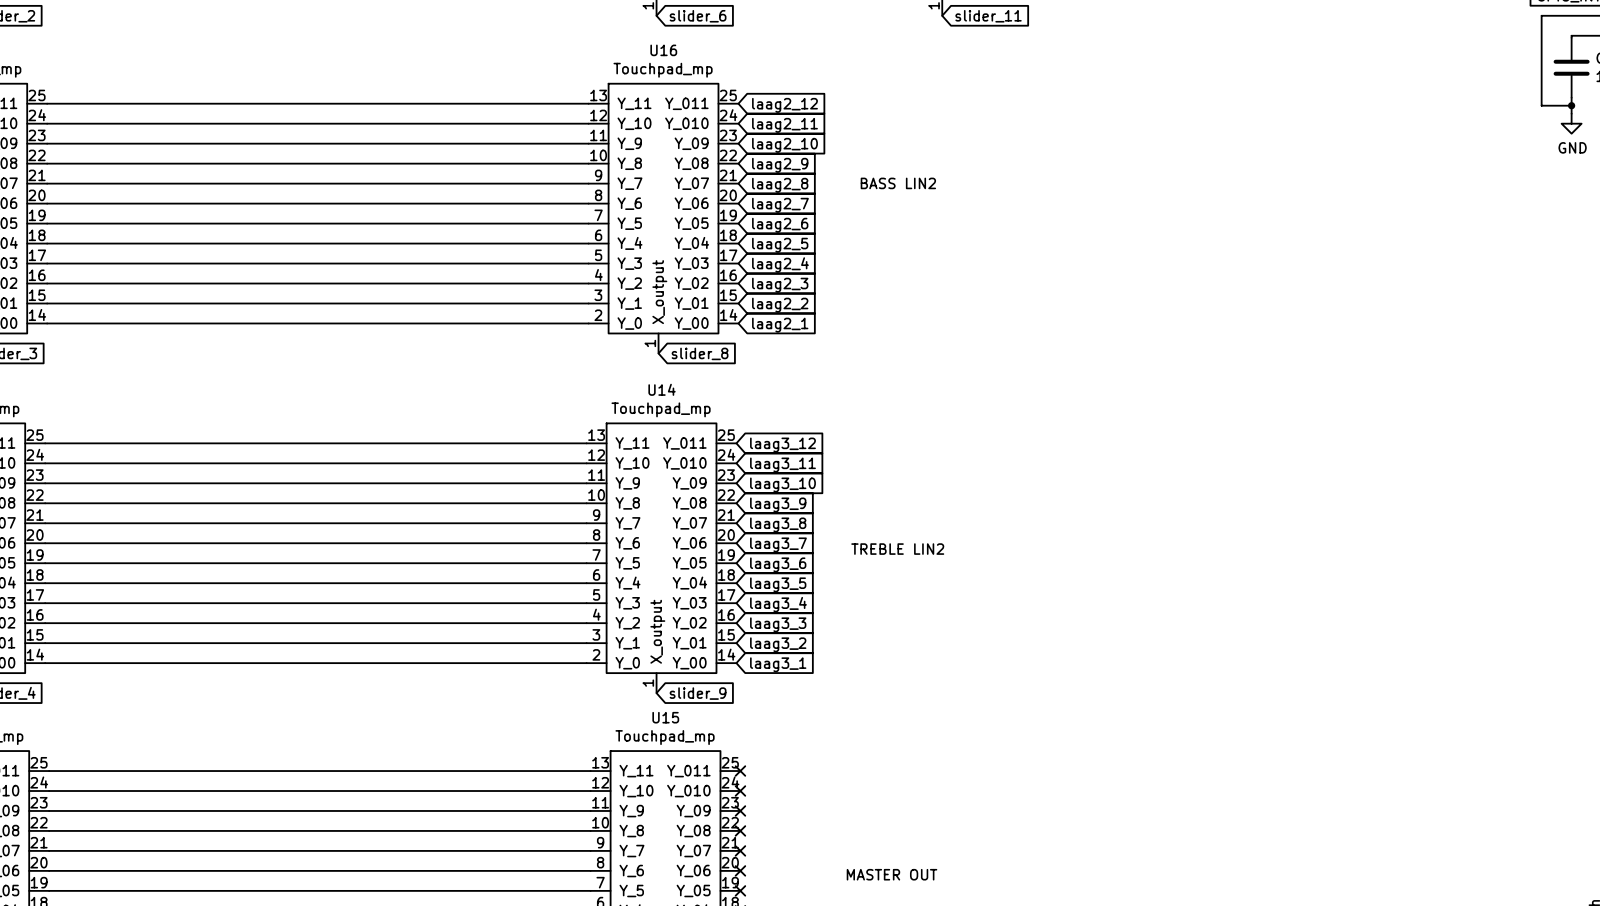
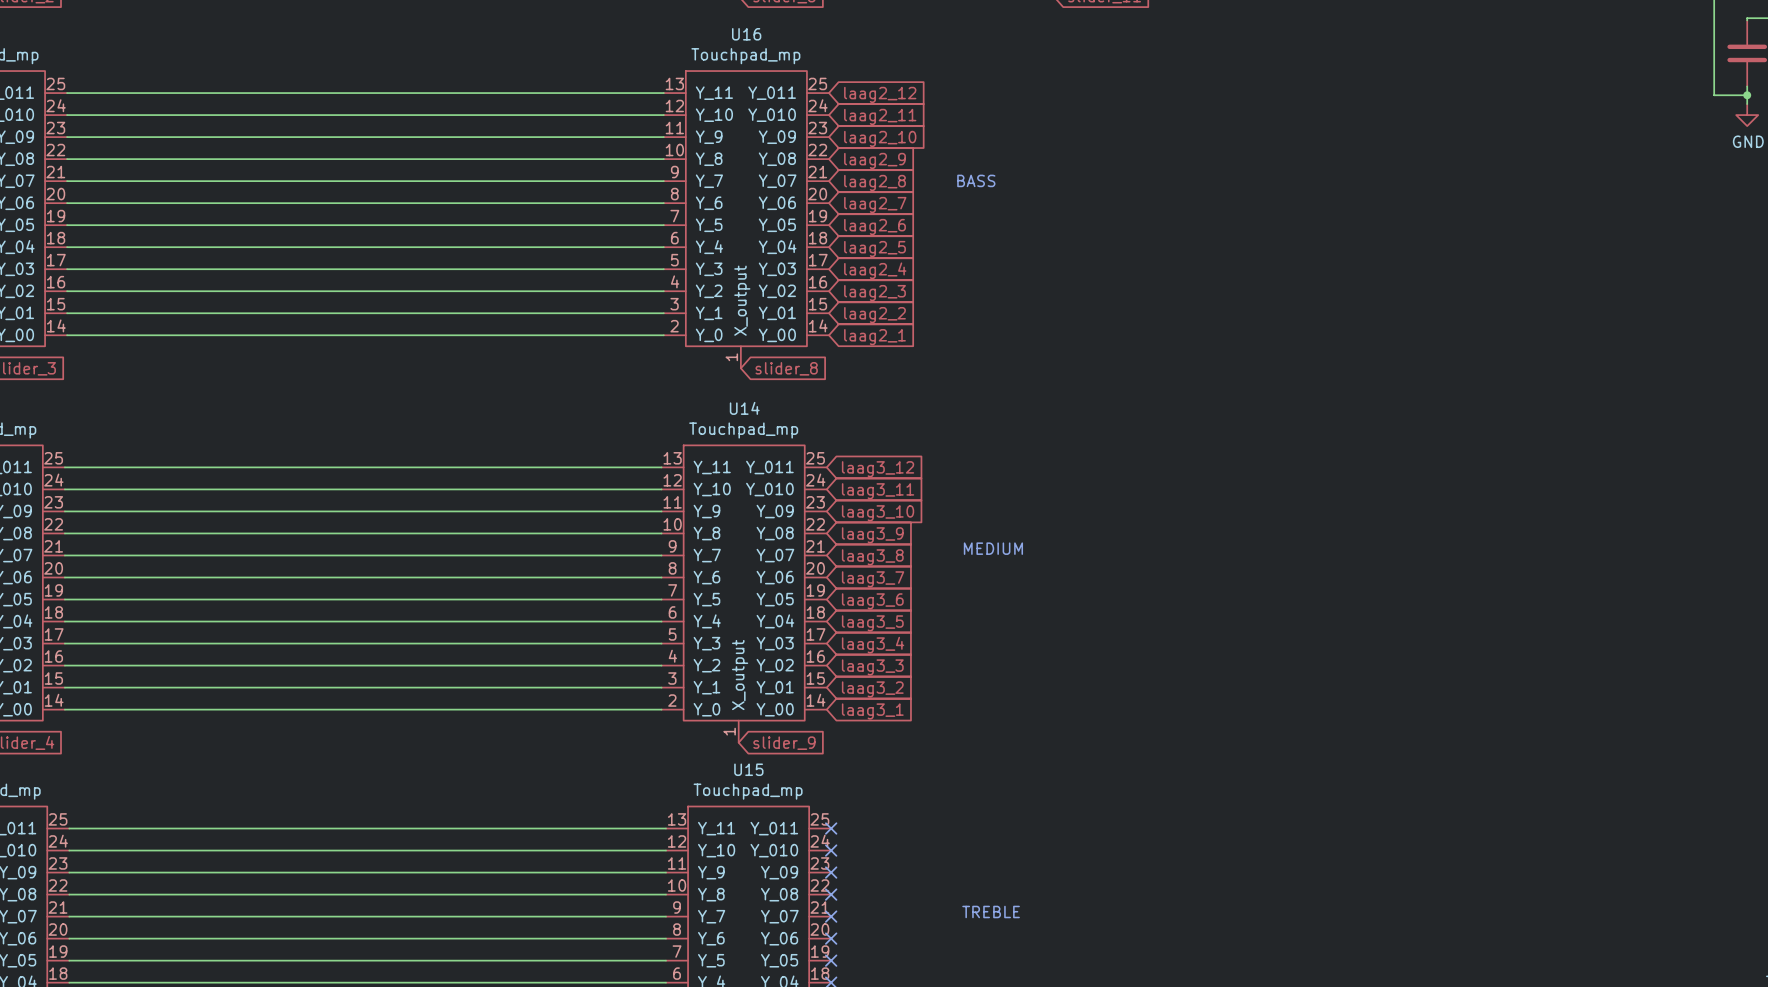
text: BASS LIN2 (898, 183) -> BASS (976, 180)
text: none -> MEDIUM (993, 548)
text: TREBLE LIN2 (897, 549) -> none
text: none -> TREBLE (991, 911)
text: MASTER OUT (892, 874) -> none

